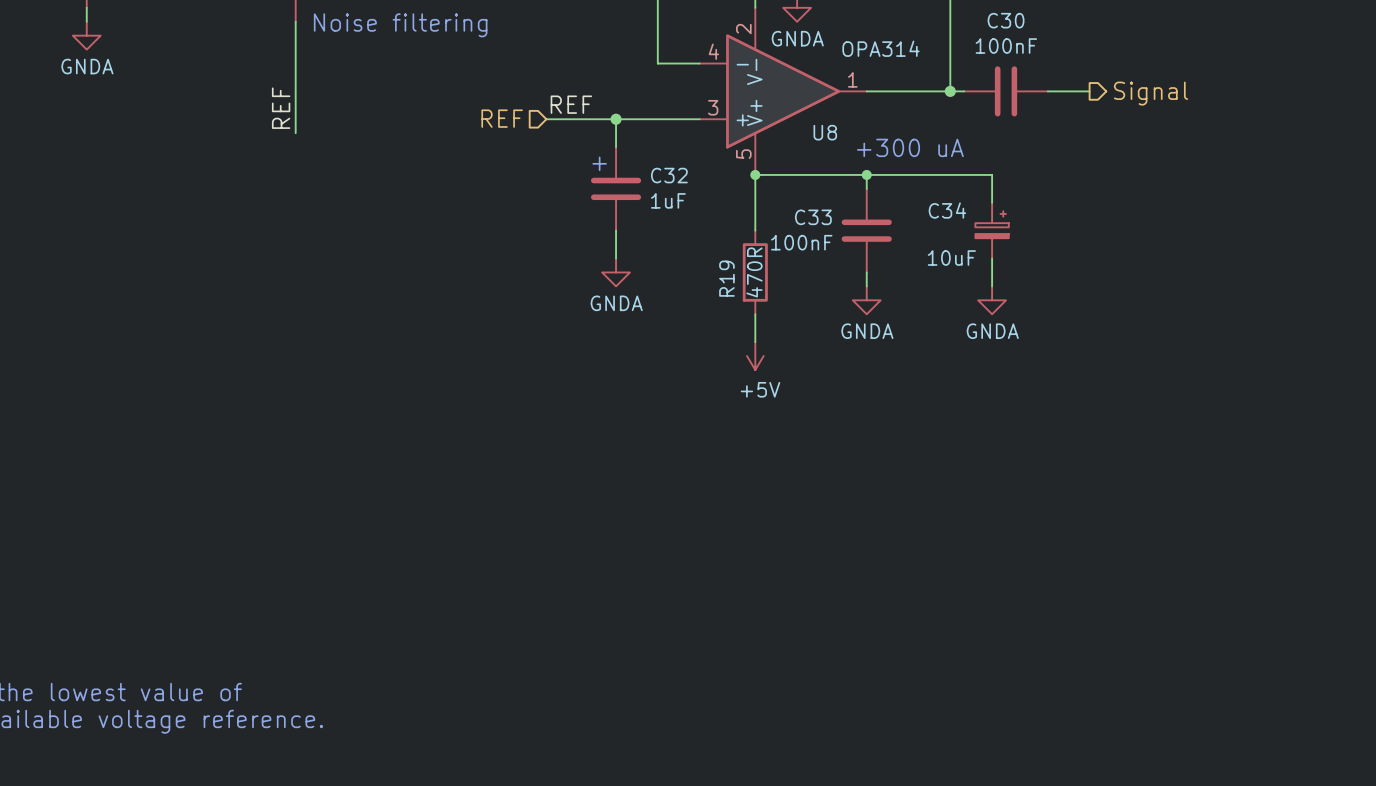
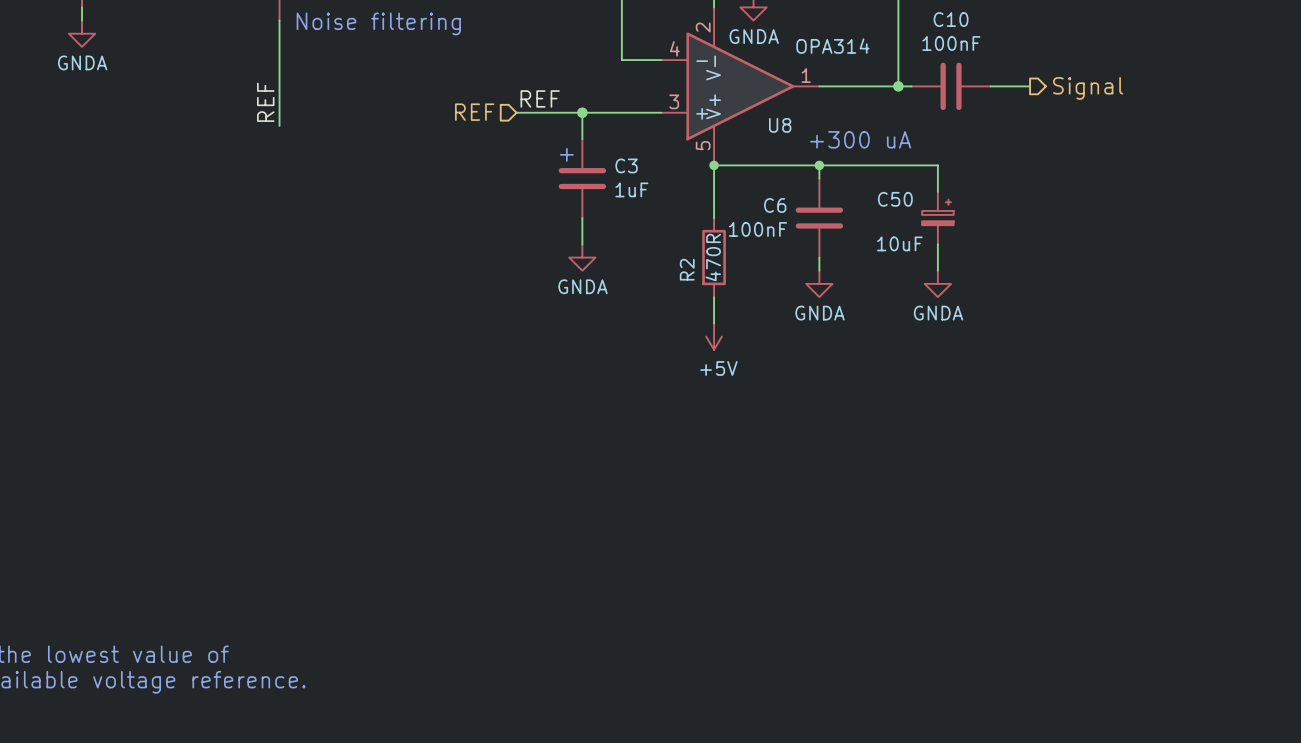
C30 name: C30 (1006, 20) -> C10 (951, 19)
C32 name: C32 (669, 175) -> C3 (626, 165)
C34 name: C34 (947, 210) -> C50 (895, 199)
C33 name: C33 (813, 217) -> C6 (775, 205)
R19 name: R19 (726, 278) -> R2 (687, 269)

